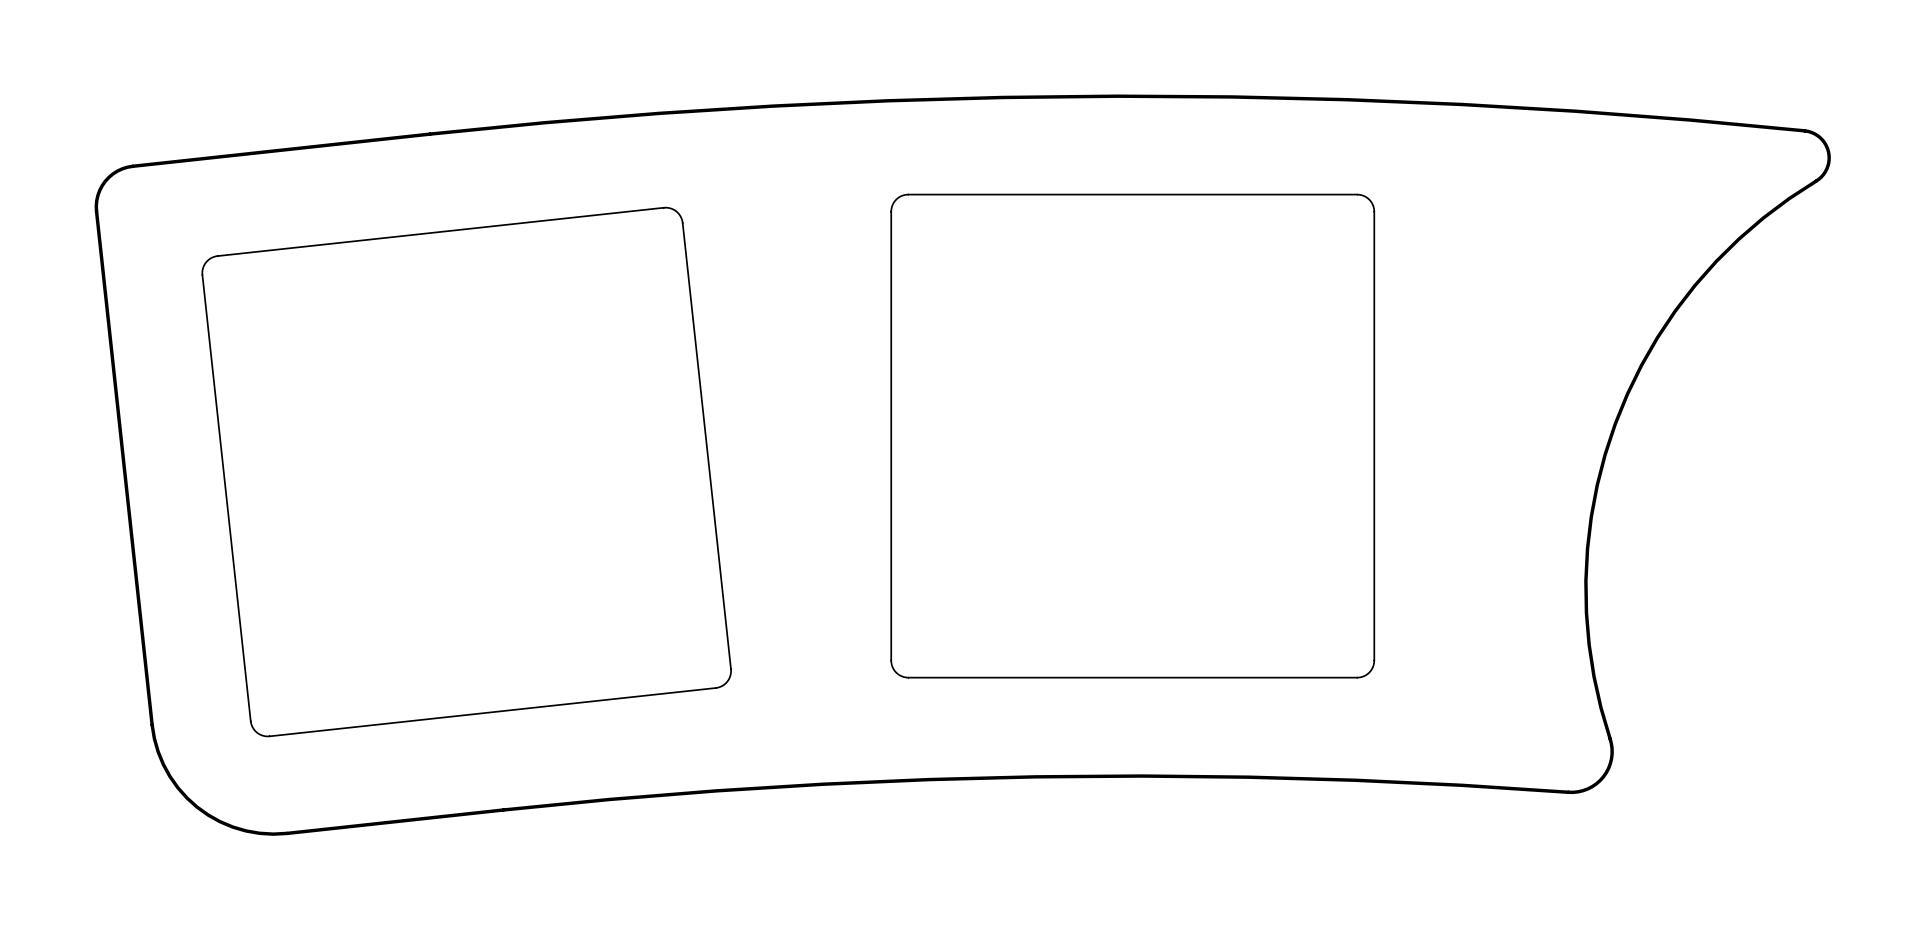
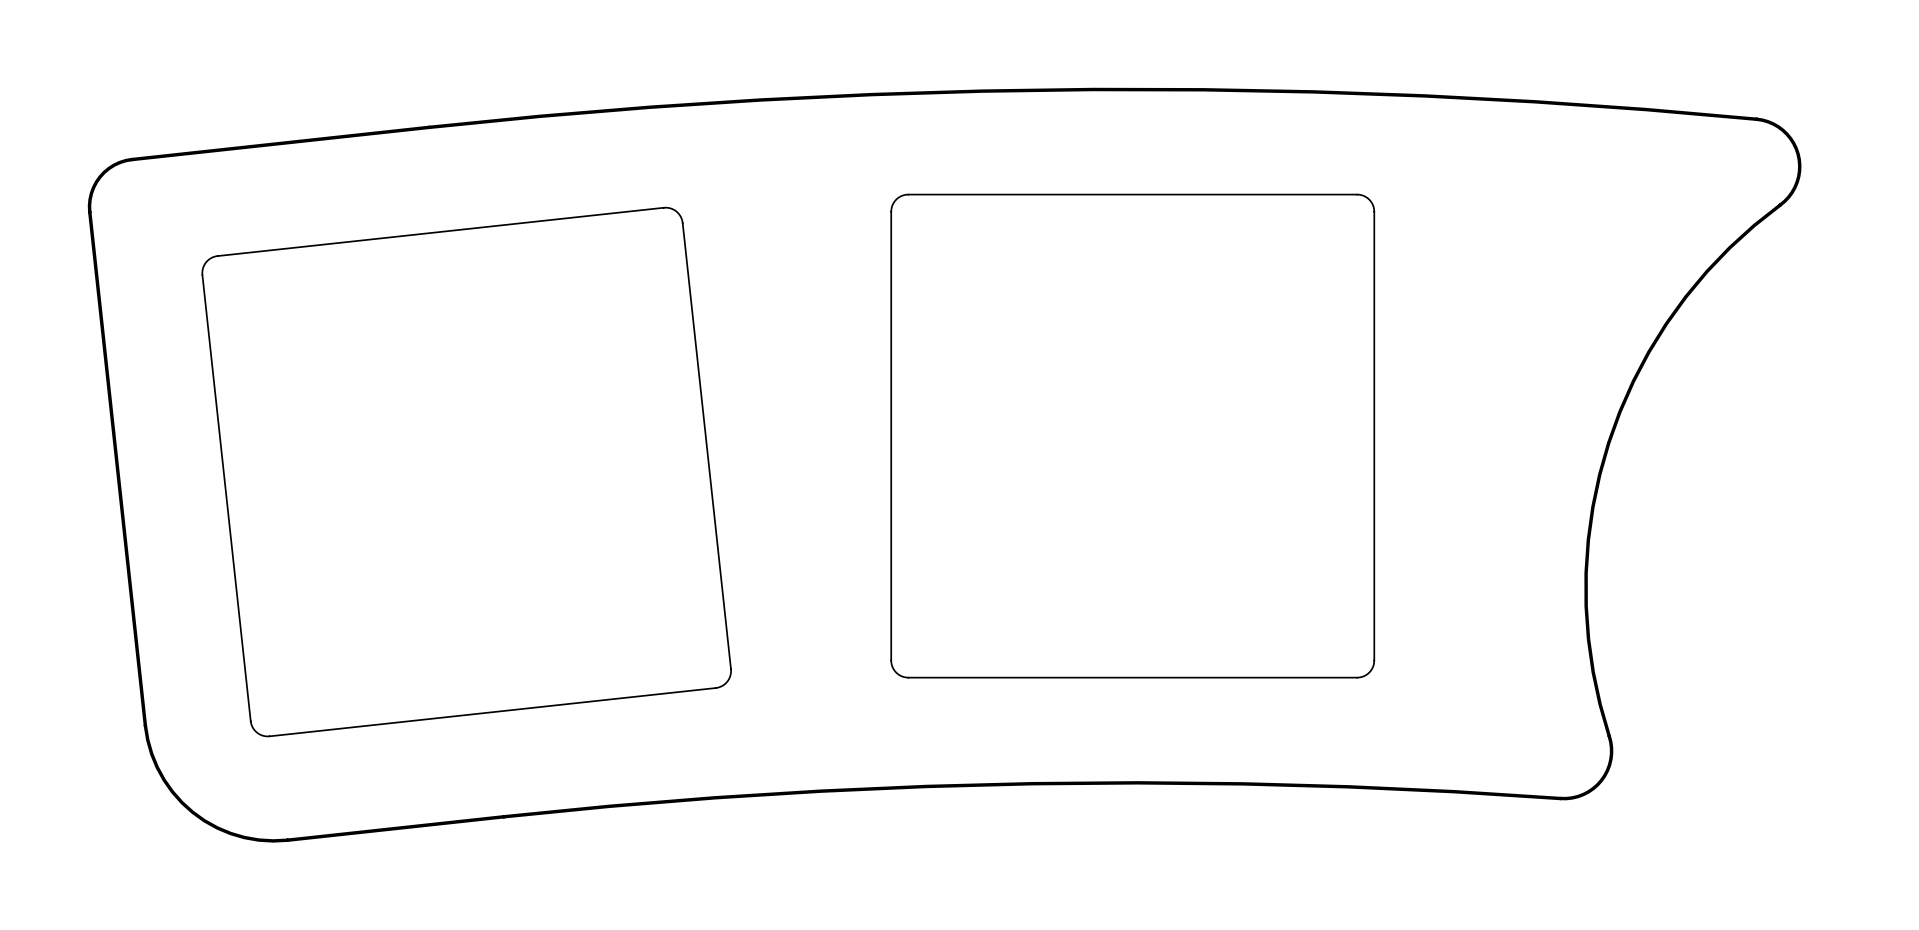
board edge: (1804, 130) (1690, 120) (1461, 104) (1232, 96) (1002, 97) (773, 106) (658, 113) (430, 134) (122, 168) (113, 173) (102, 185) (97, 195) (96, 211) (152, 724) (158, 751) (163, 764) (177, 787) (197, 807) (208, 815) (232, 827) (246, 830) (273, 834) (609, 799) (822, 784) (928, 779) (1035, 776) (1248, 777) (1355, 780) (1568, 792) (1587, 788) (1600, 780) (1606, 772) (1612, 753) (1611, 743) (1594, 676) (1586, 612) (1587, 548) (1591, 516) (1605, 454) (1627, 394) (1641, 365) (1657, 337) (1695, 285) (1739, 238) (1789, 198) (1818, 179) (1825, 171) (1829, 158) (1826, 145) (1817, 135) (1804, 130) -> (1756, 119) (1535, 101) (1314, 91) (1092, 89) (982, 91) (760, 99) (539, 116) (131, 159) (119, 162) (108, 168) (96, 182) (90, 199) (89, 211) (145, 725) (151, 753) (164, 780) (172, 791) (192, 812) (204, 820) (230, 833) (258, 840) (273, 840) (609, 806) (820, 791) (926, 786) (1137, 782) (1243, 783) (1349, 786) (1560, 798) (1583, 794) (1601, 780) (1609, 764) (1611, 753) (1610, 741) (1593, 672) (1586, 606) (1588, 540) (1599, 474) (1619, 411) (1648, 352) (1666, 324) (1706, 271) (1754, 225) (1784, 201) (1794, 187) (1799, 165) (1793, 143) (1778, 126) (1756, 119)

